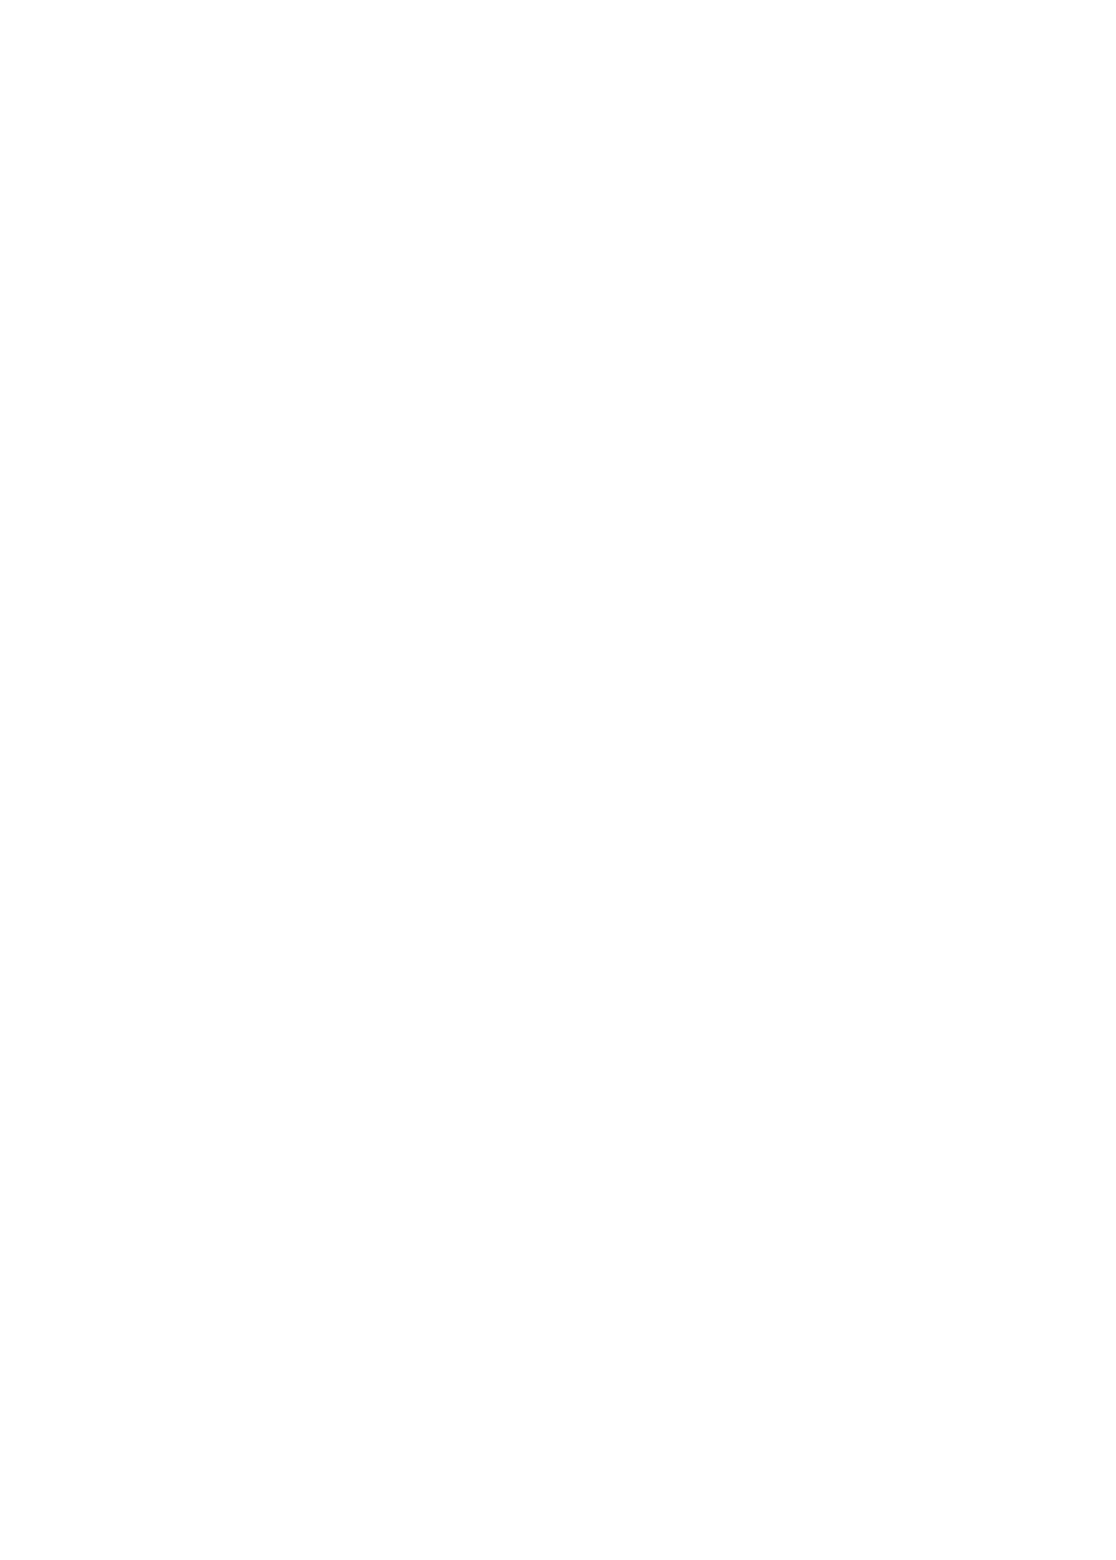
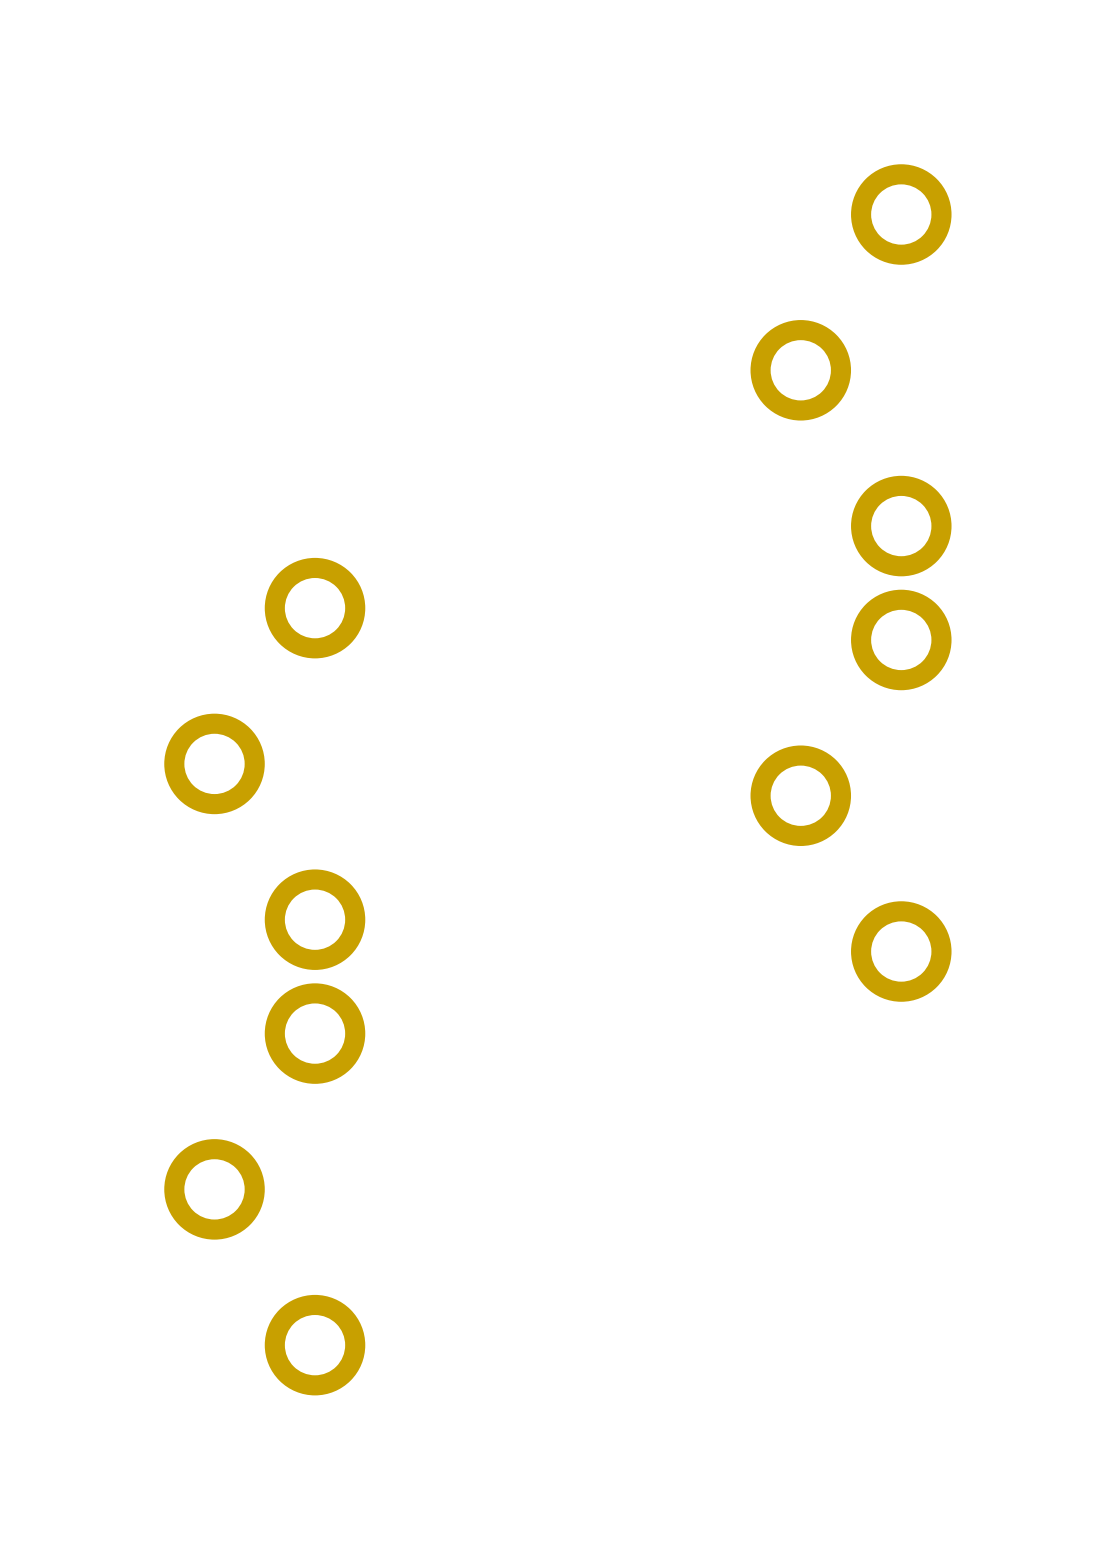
part: none -> (851, 583)
part: none -> (264, 976)

